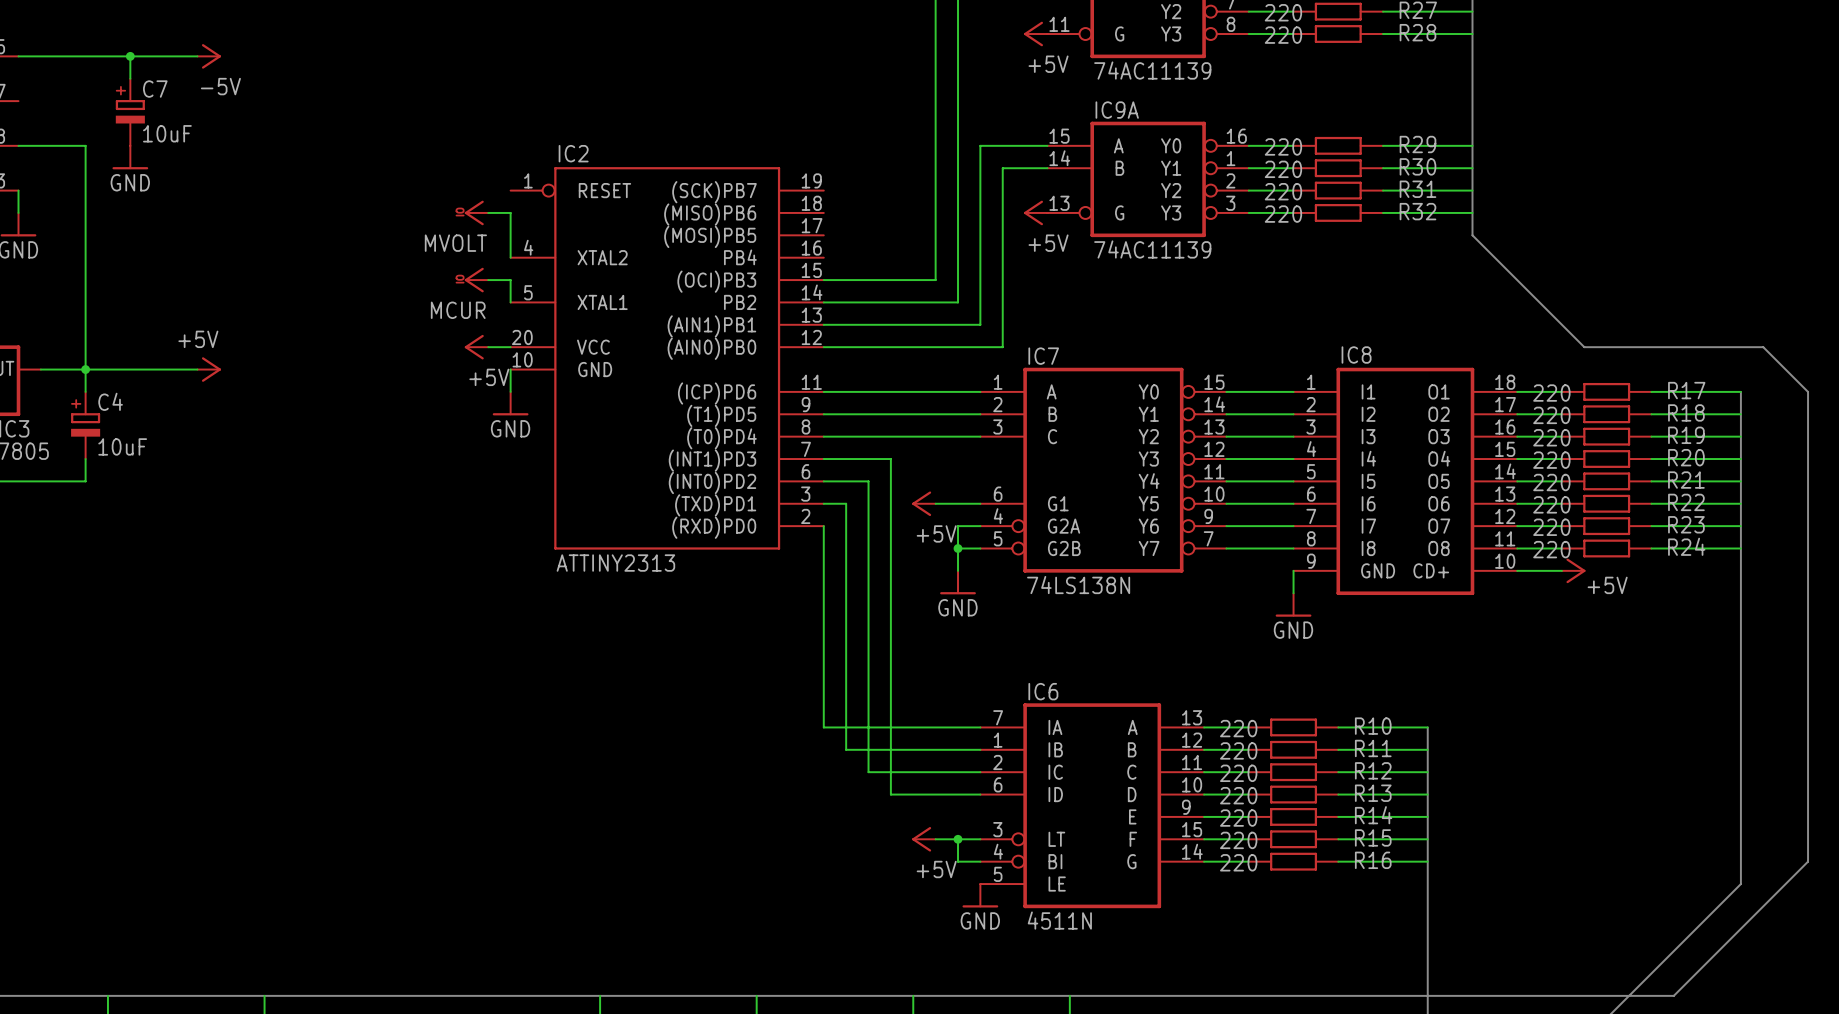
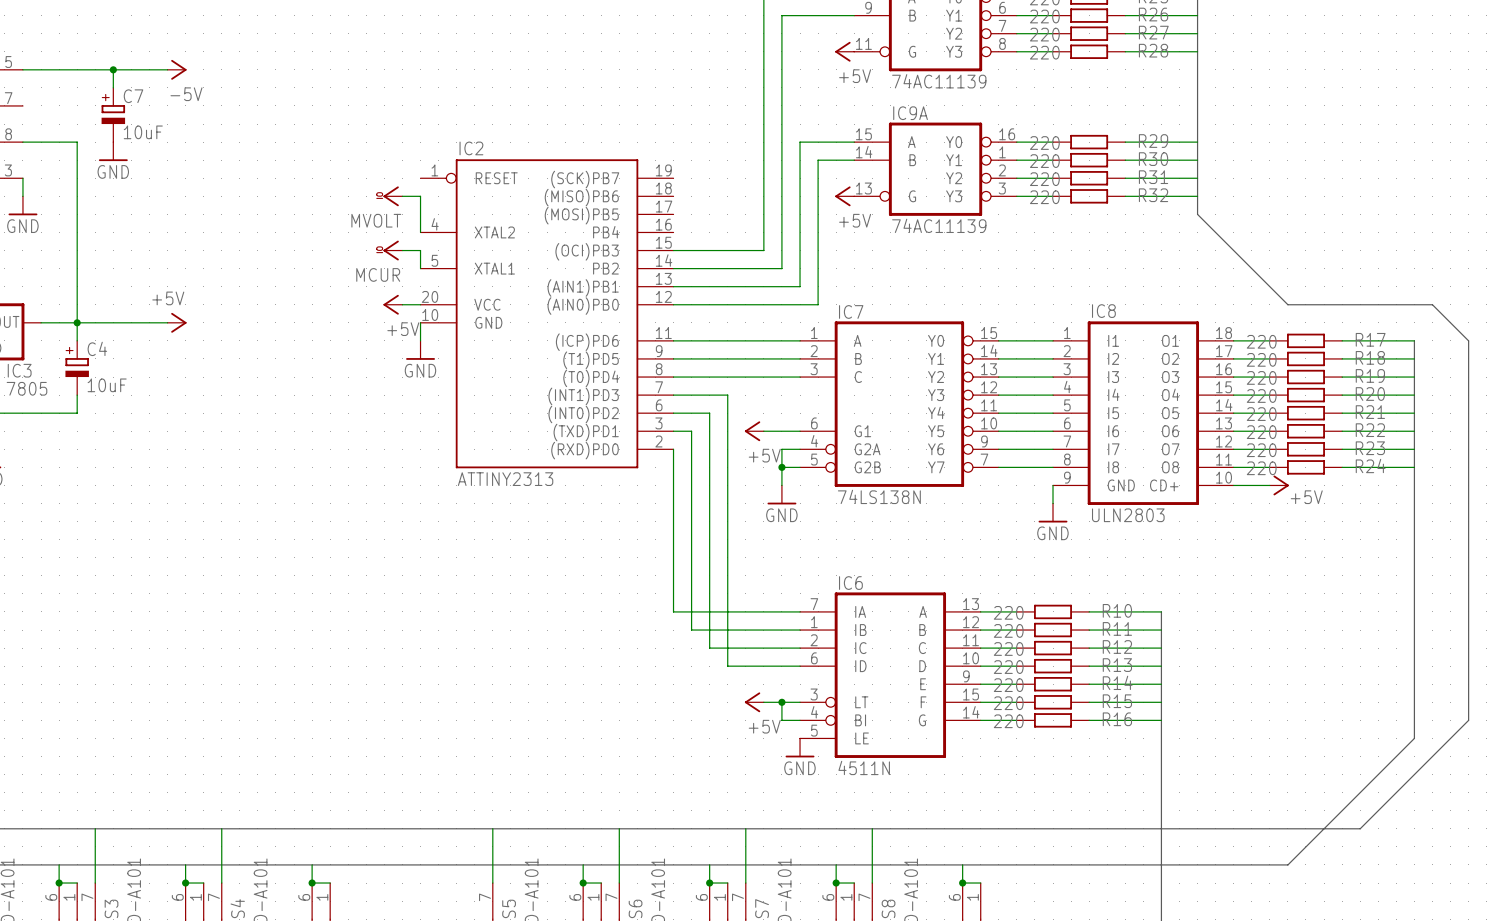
IC8 value: none -> ULN2803 (1128, 515)

